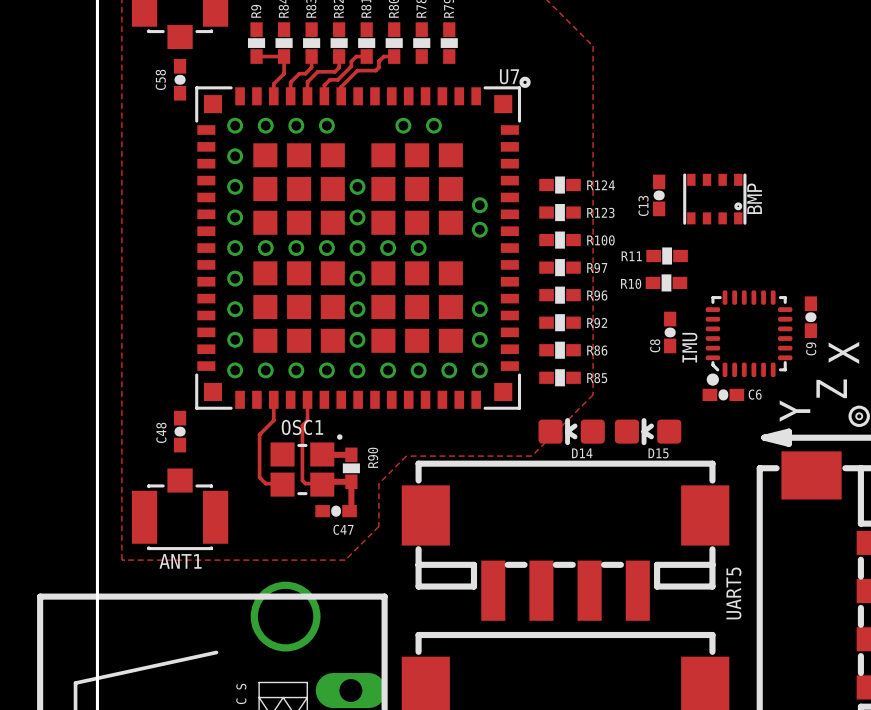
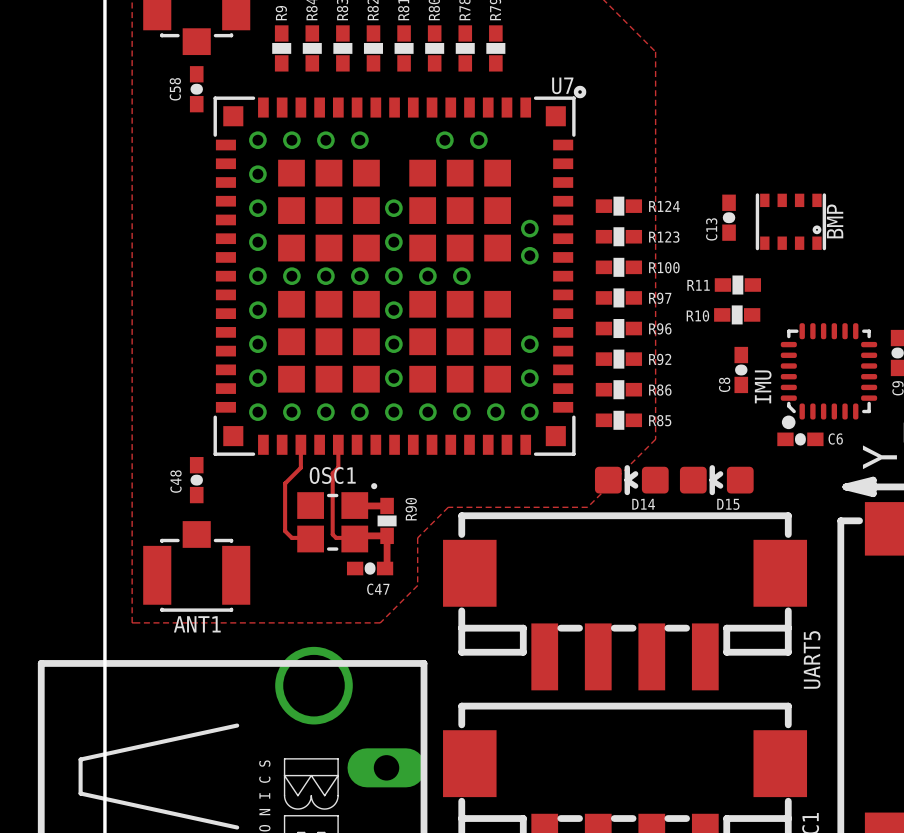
track: (256, 56) (284, 56) (284, 73) (273, 83) (273, 96) -> none
track: (311, 56) (311, 67) (305, 73) (299, 73) (290, 82) (290, 96) -> none
track: (339, 56) (339, 67) (334, 71) (317, 71) (307, 82) (307, 96) -> none
track: (366, 56) (356, 56) (351, 61) (351, 66) (337, 79) (329, 79) (324, 85) (324, 96) -> none
track: (394, 56) (383, 56) (378, 61) (378, 67) (375, 70) (357, 70) (341, 86) (341, 96) -> none

